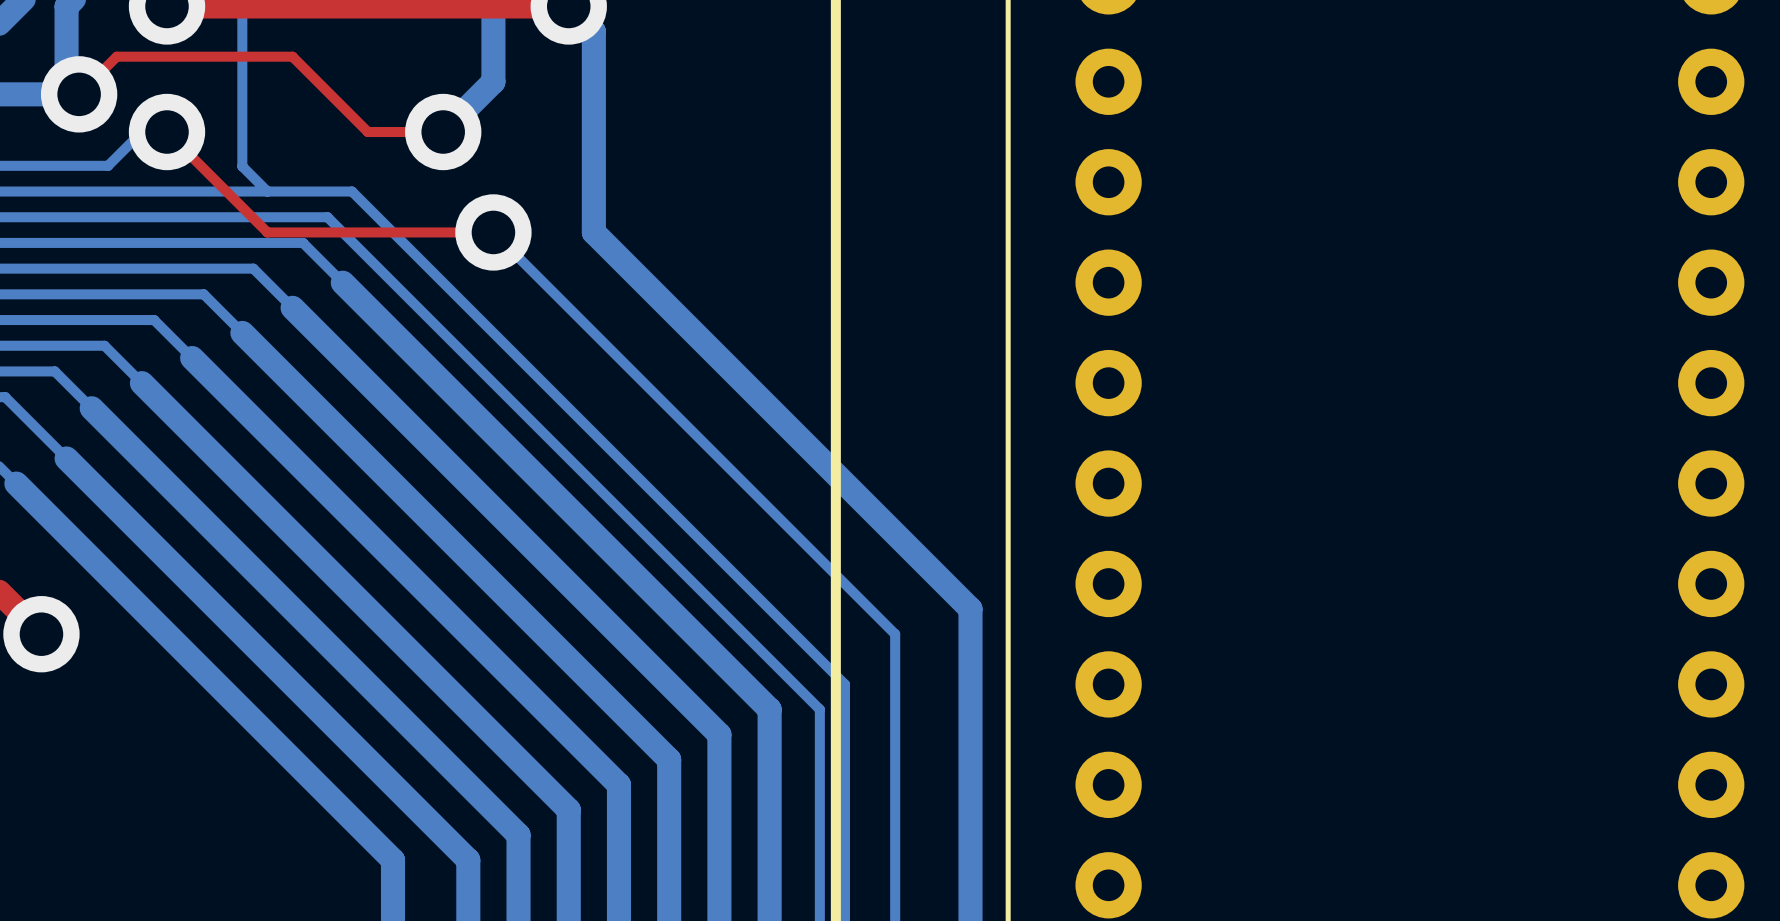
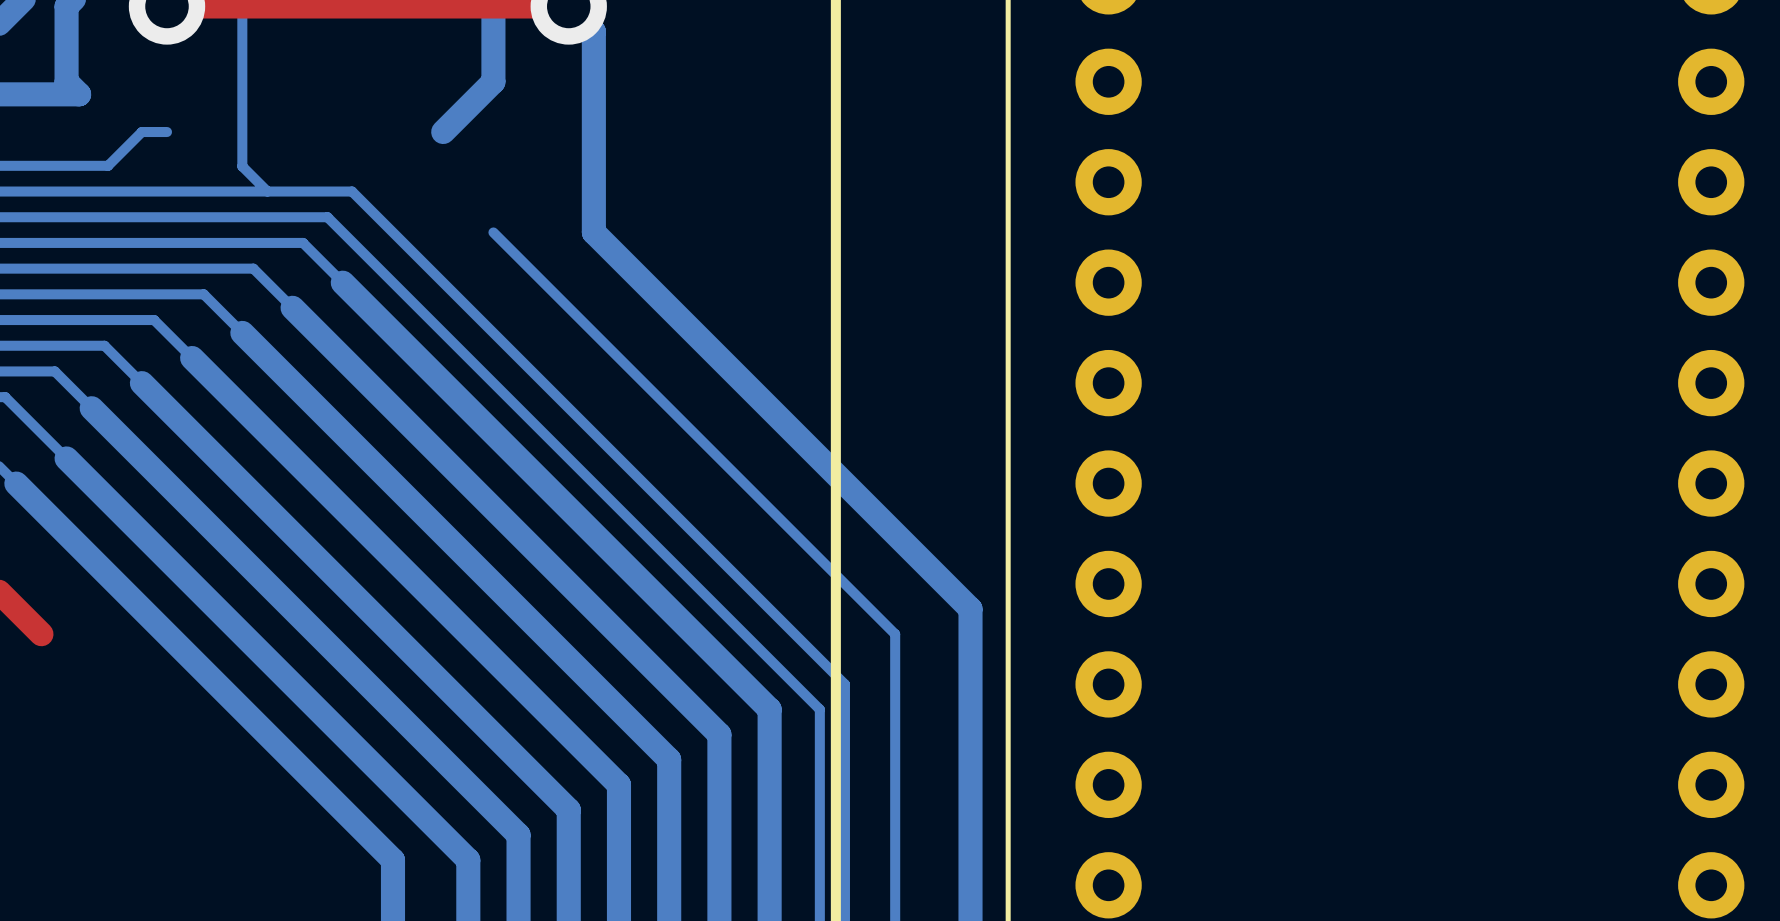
top track: (91, 81) (79, 94) (116, 56) (292, 56) (367, 132) (443, 132) -> none
via: (79, 94) -> none
top track: (167, 132) (267, 232) (493, 232) -> none
via: (167, 132) -> none
via: (443, 132) -> none
via: (493, 232) -> none
via: (41, 634) -> none

